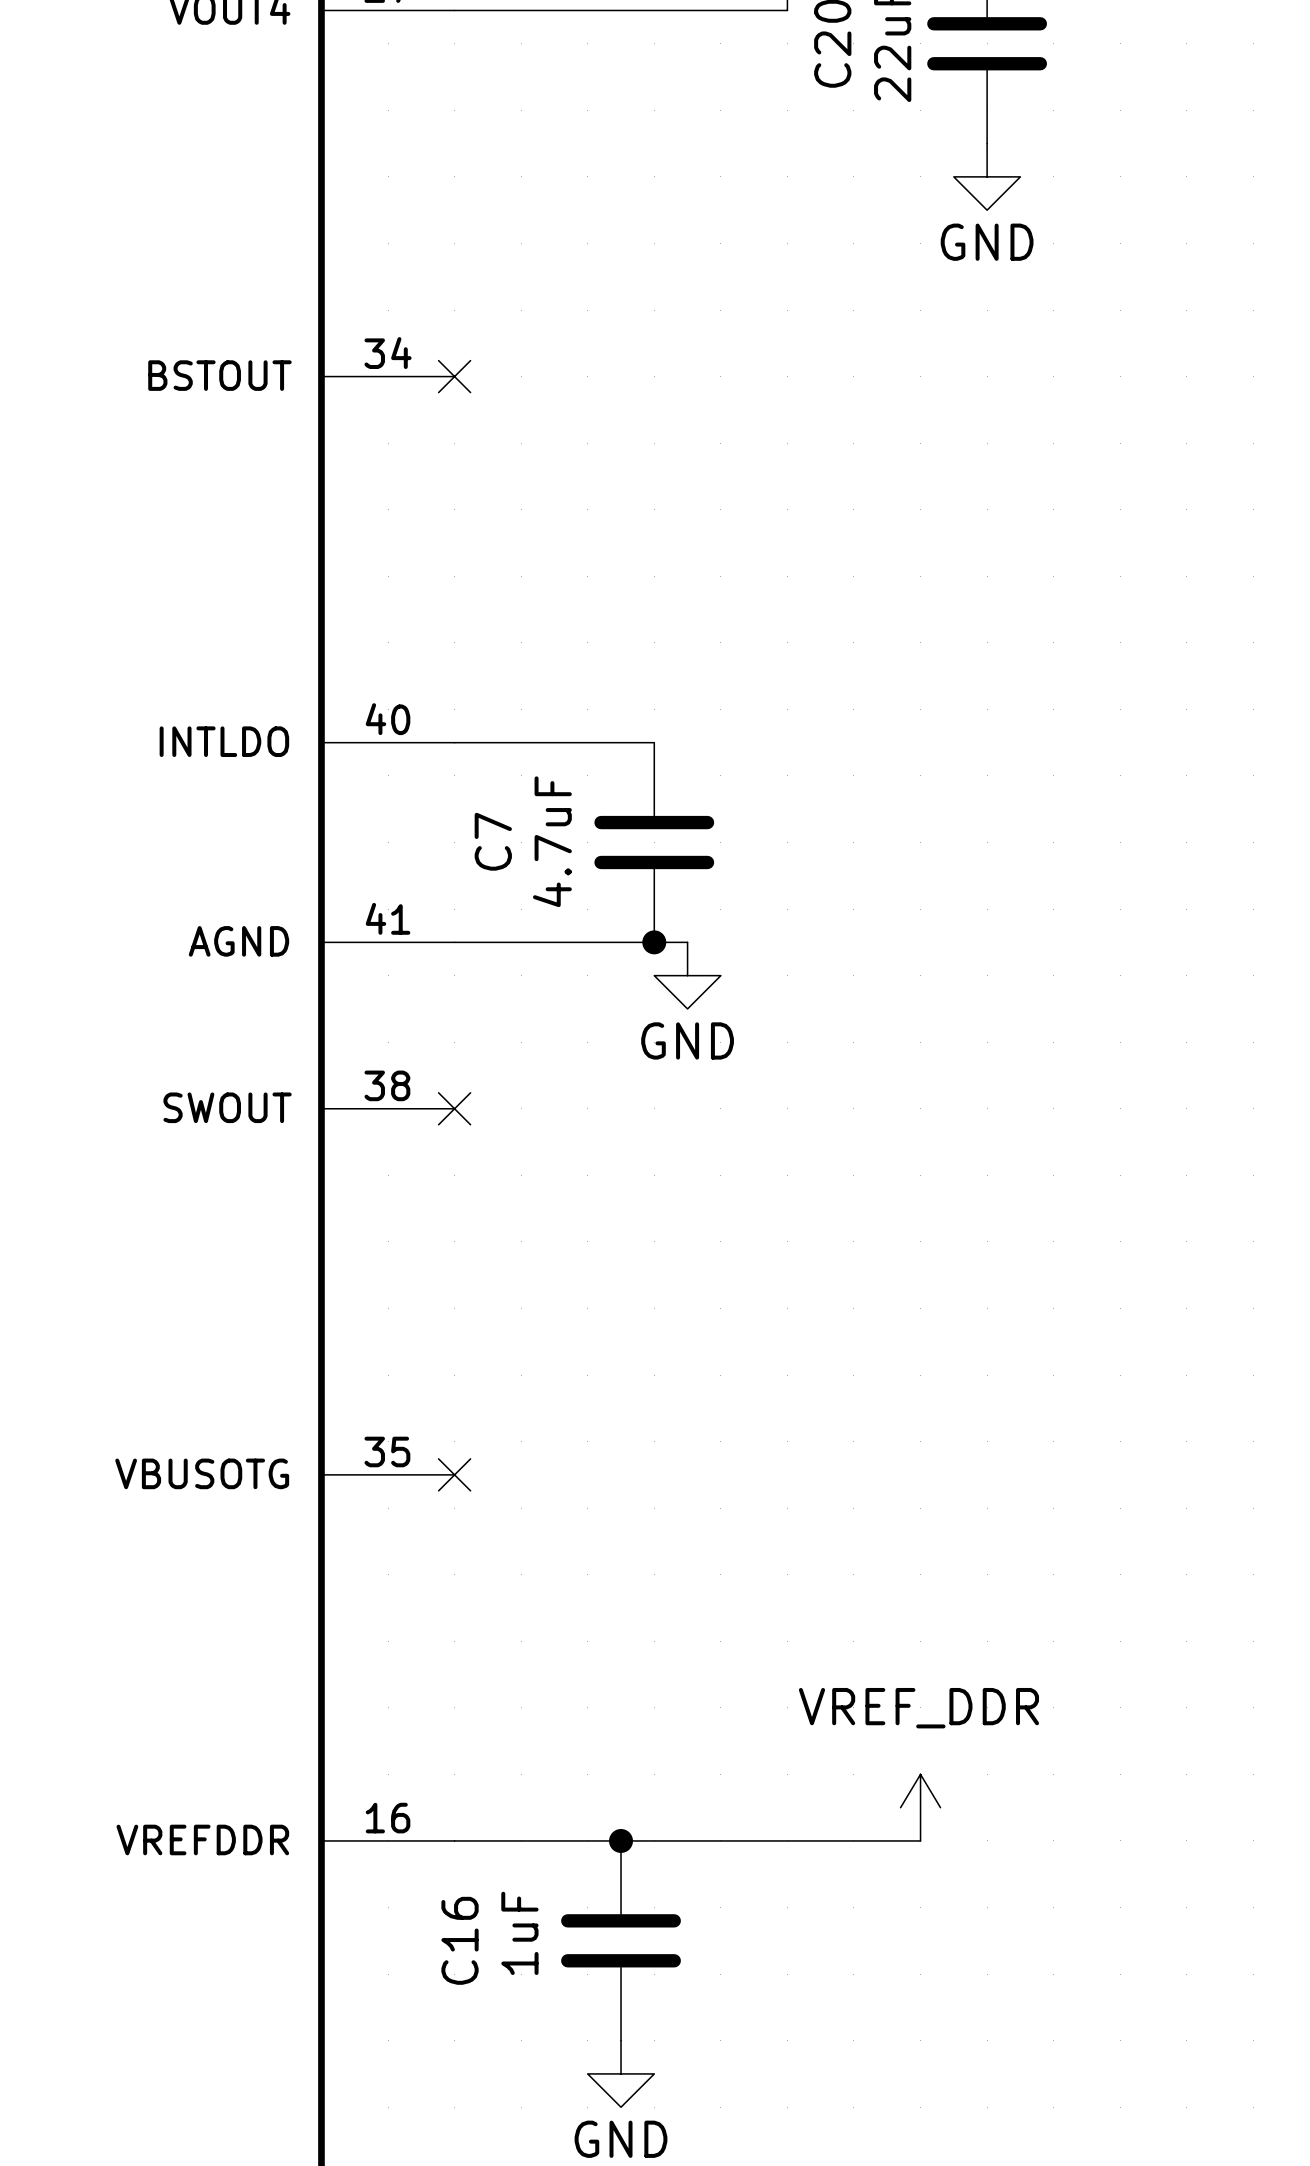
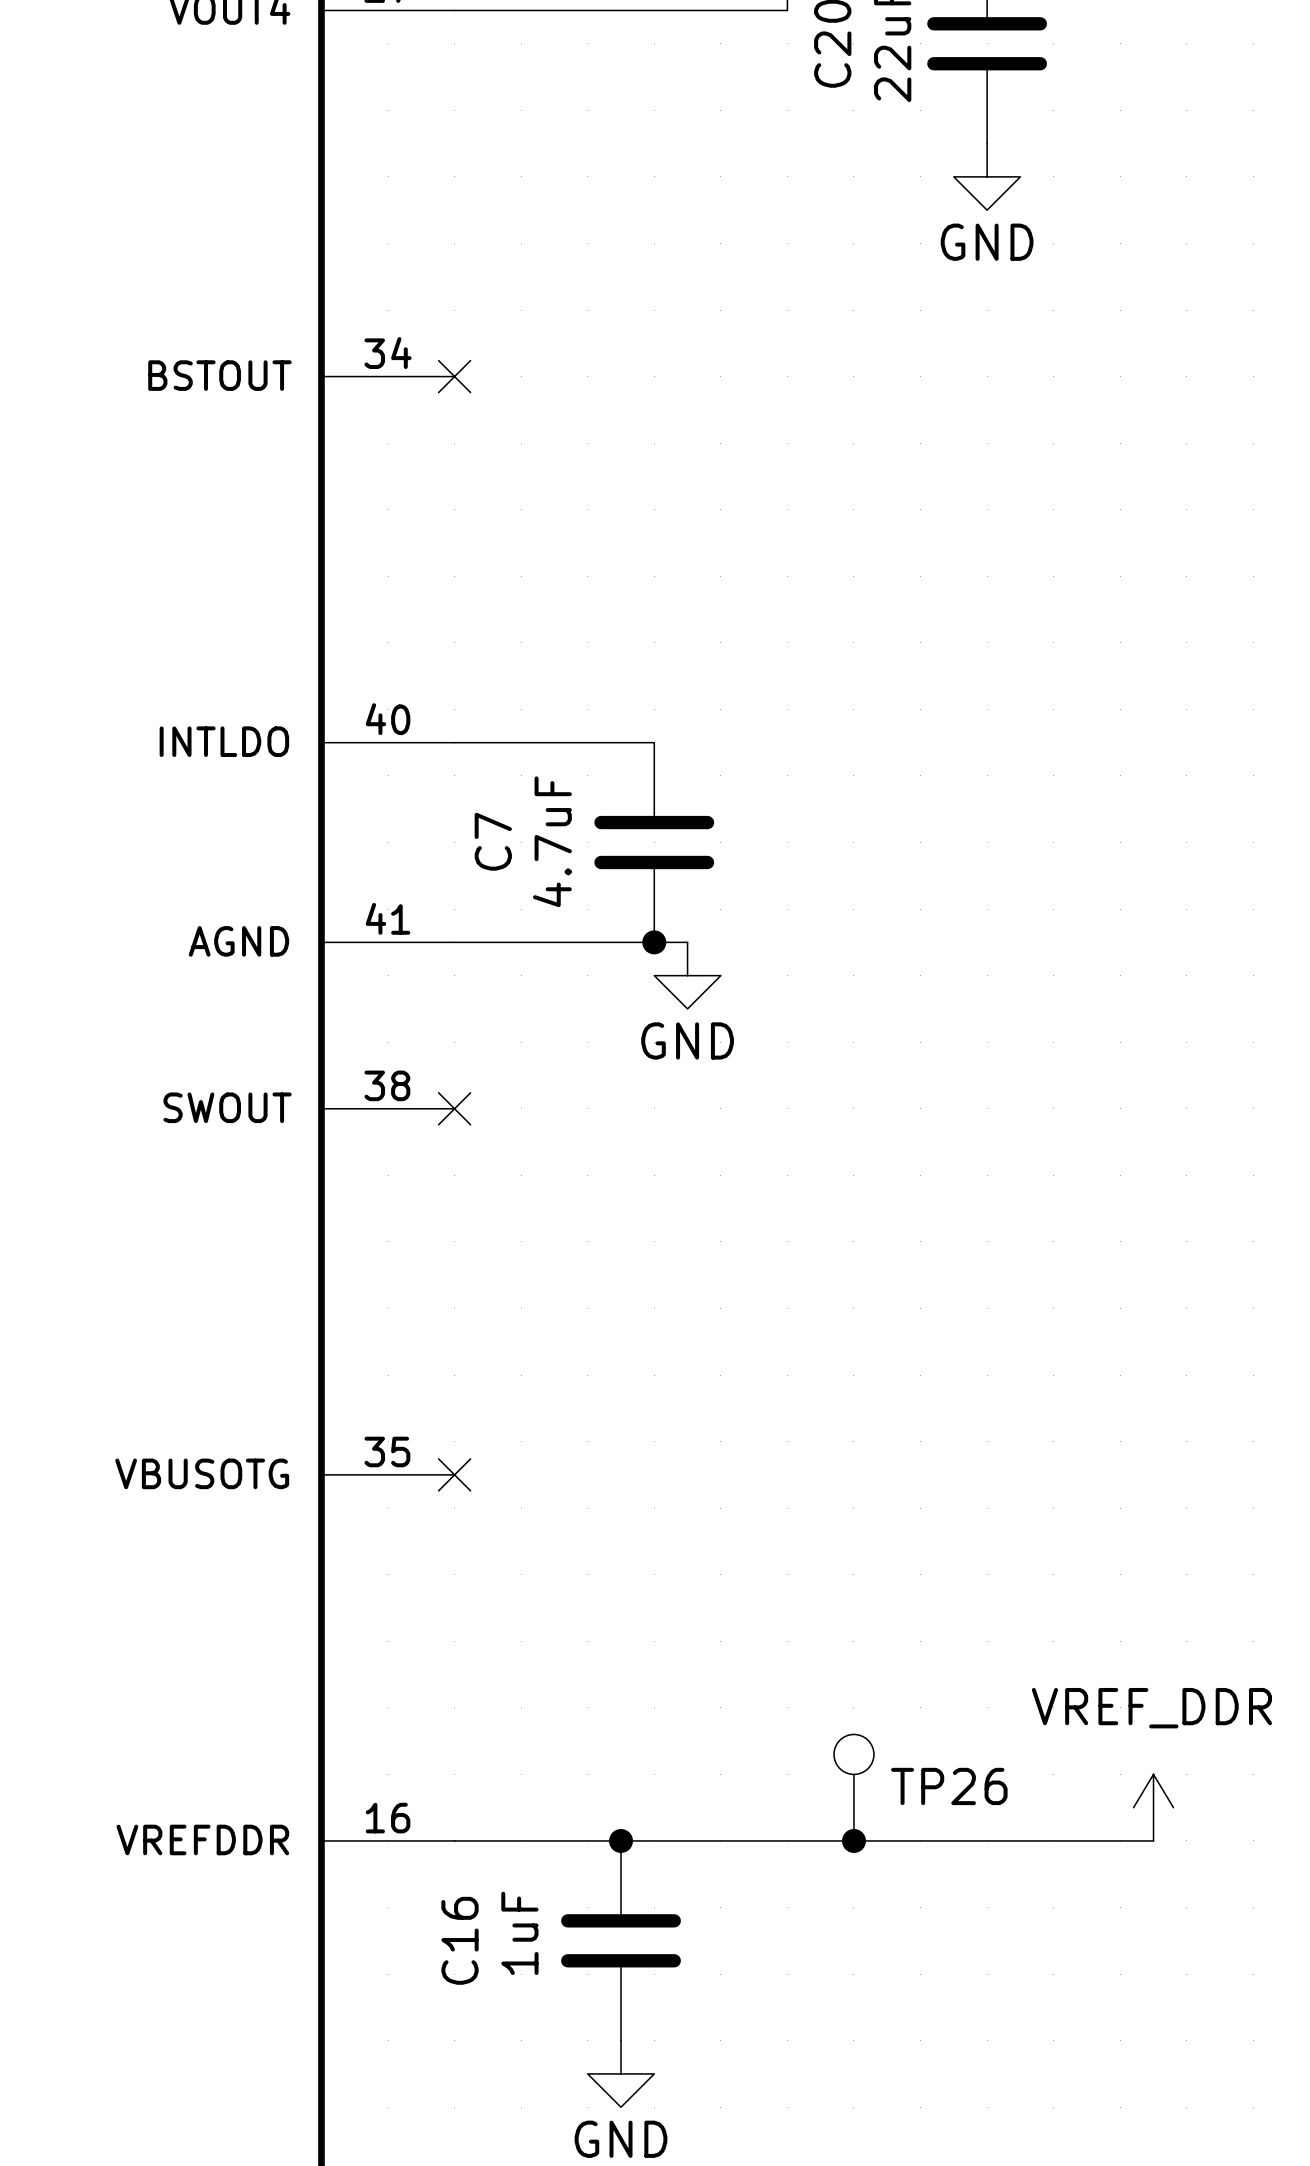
TP26: none -> (853, 1787)
power symbol position: VREF_DDR (920, 1807) -> VREF_DDR (1153, 1807)
junction: none -> (853, 1840)
wire: none -> (920, 1840) (1153, 1840)

